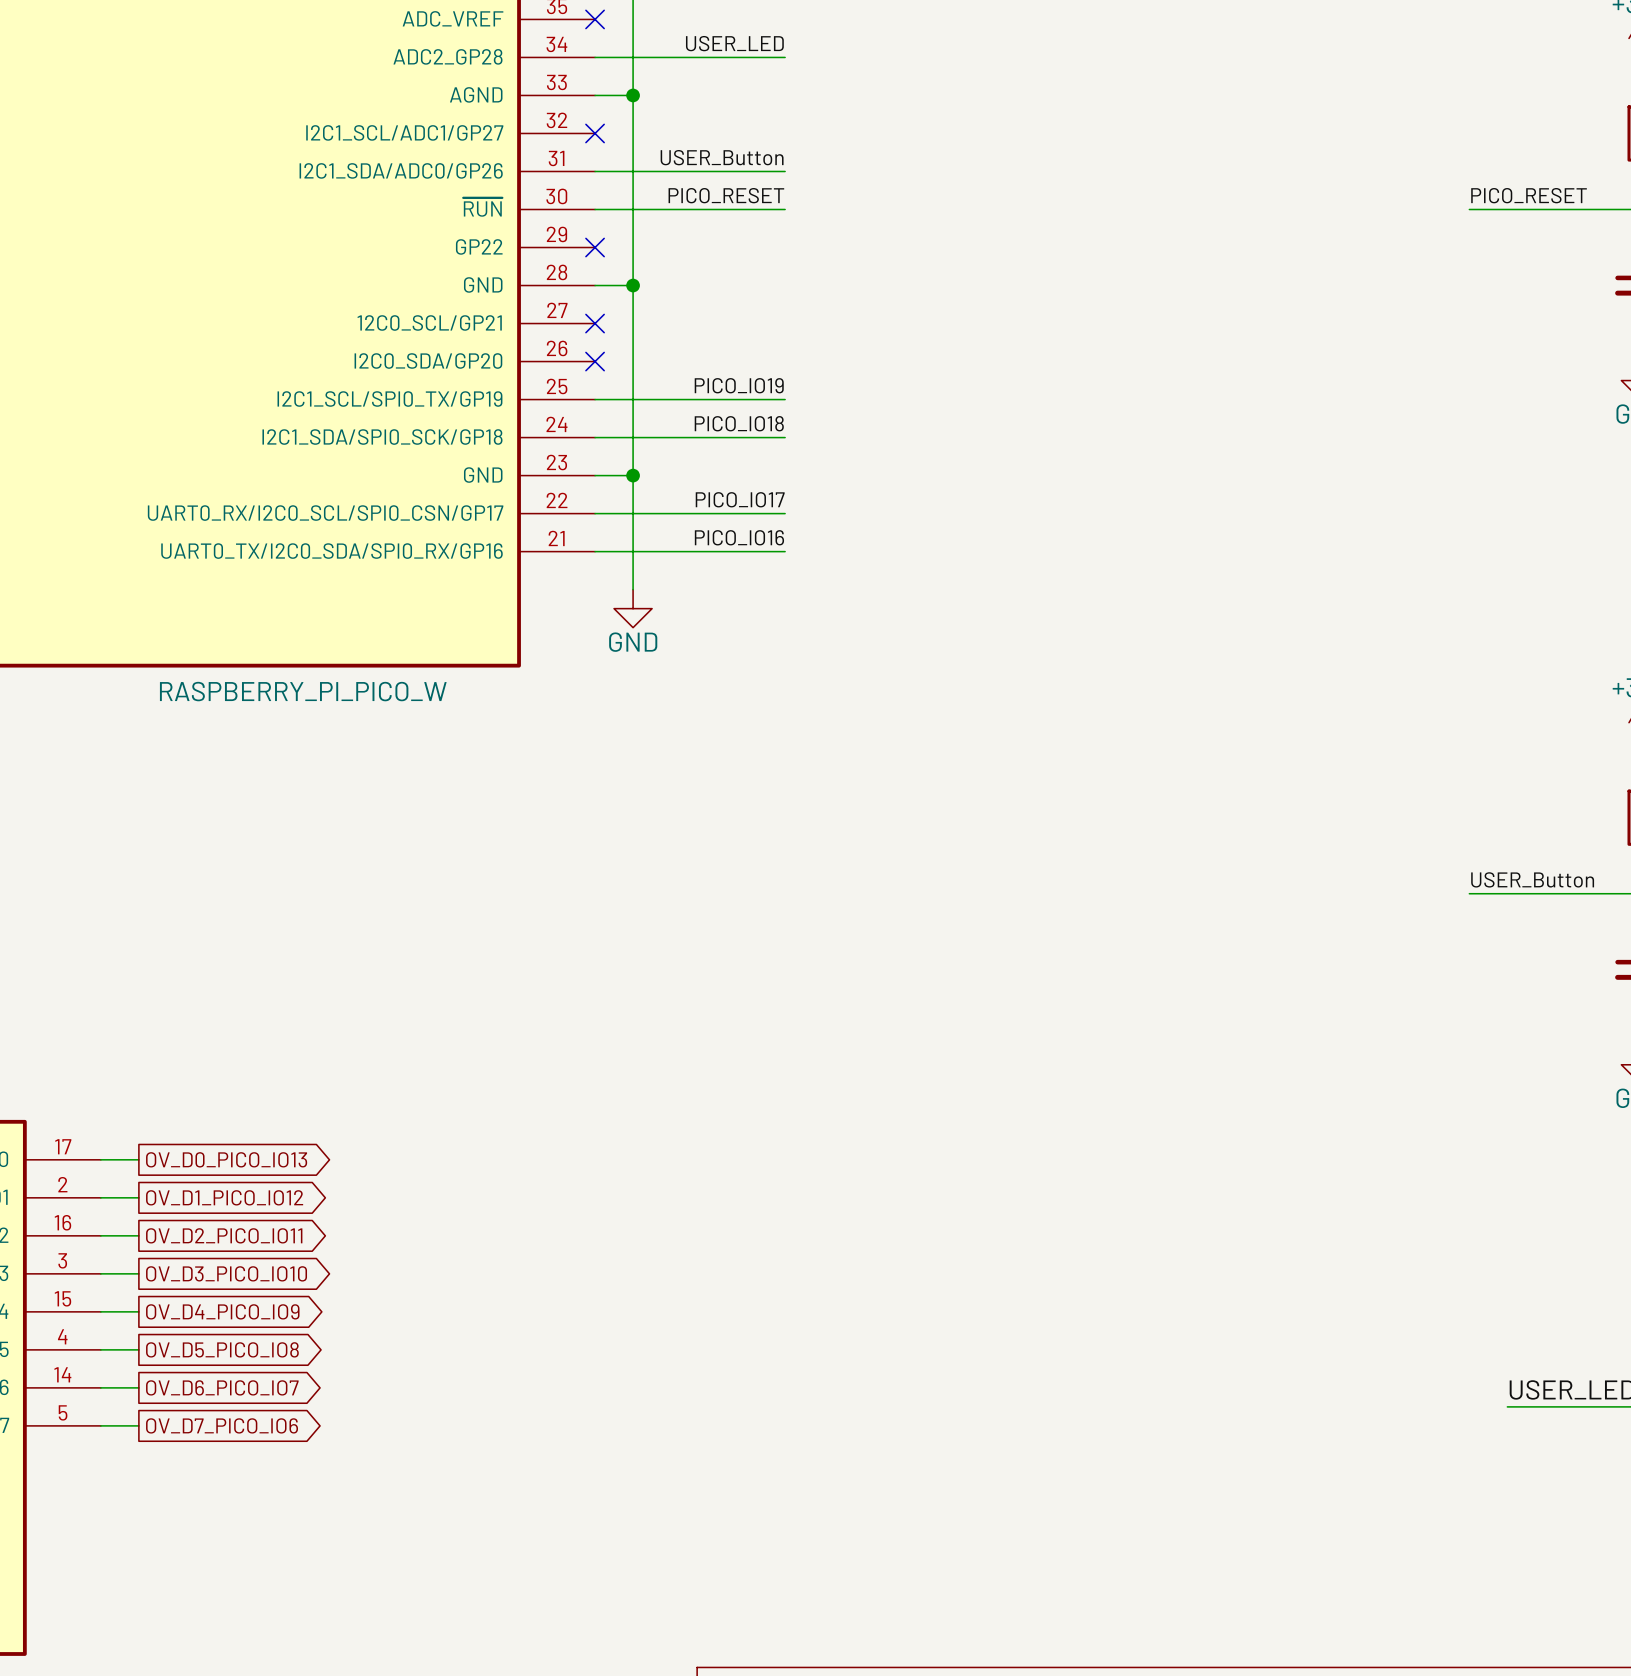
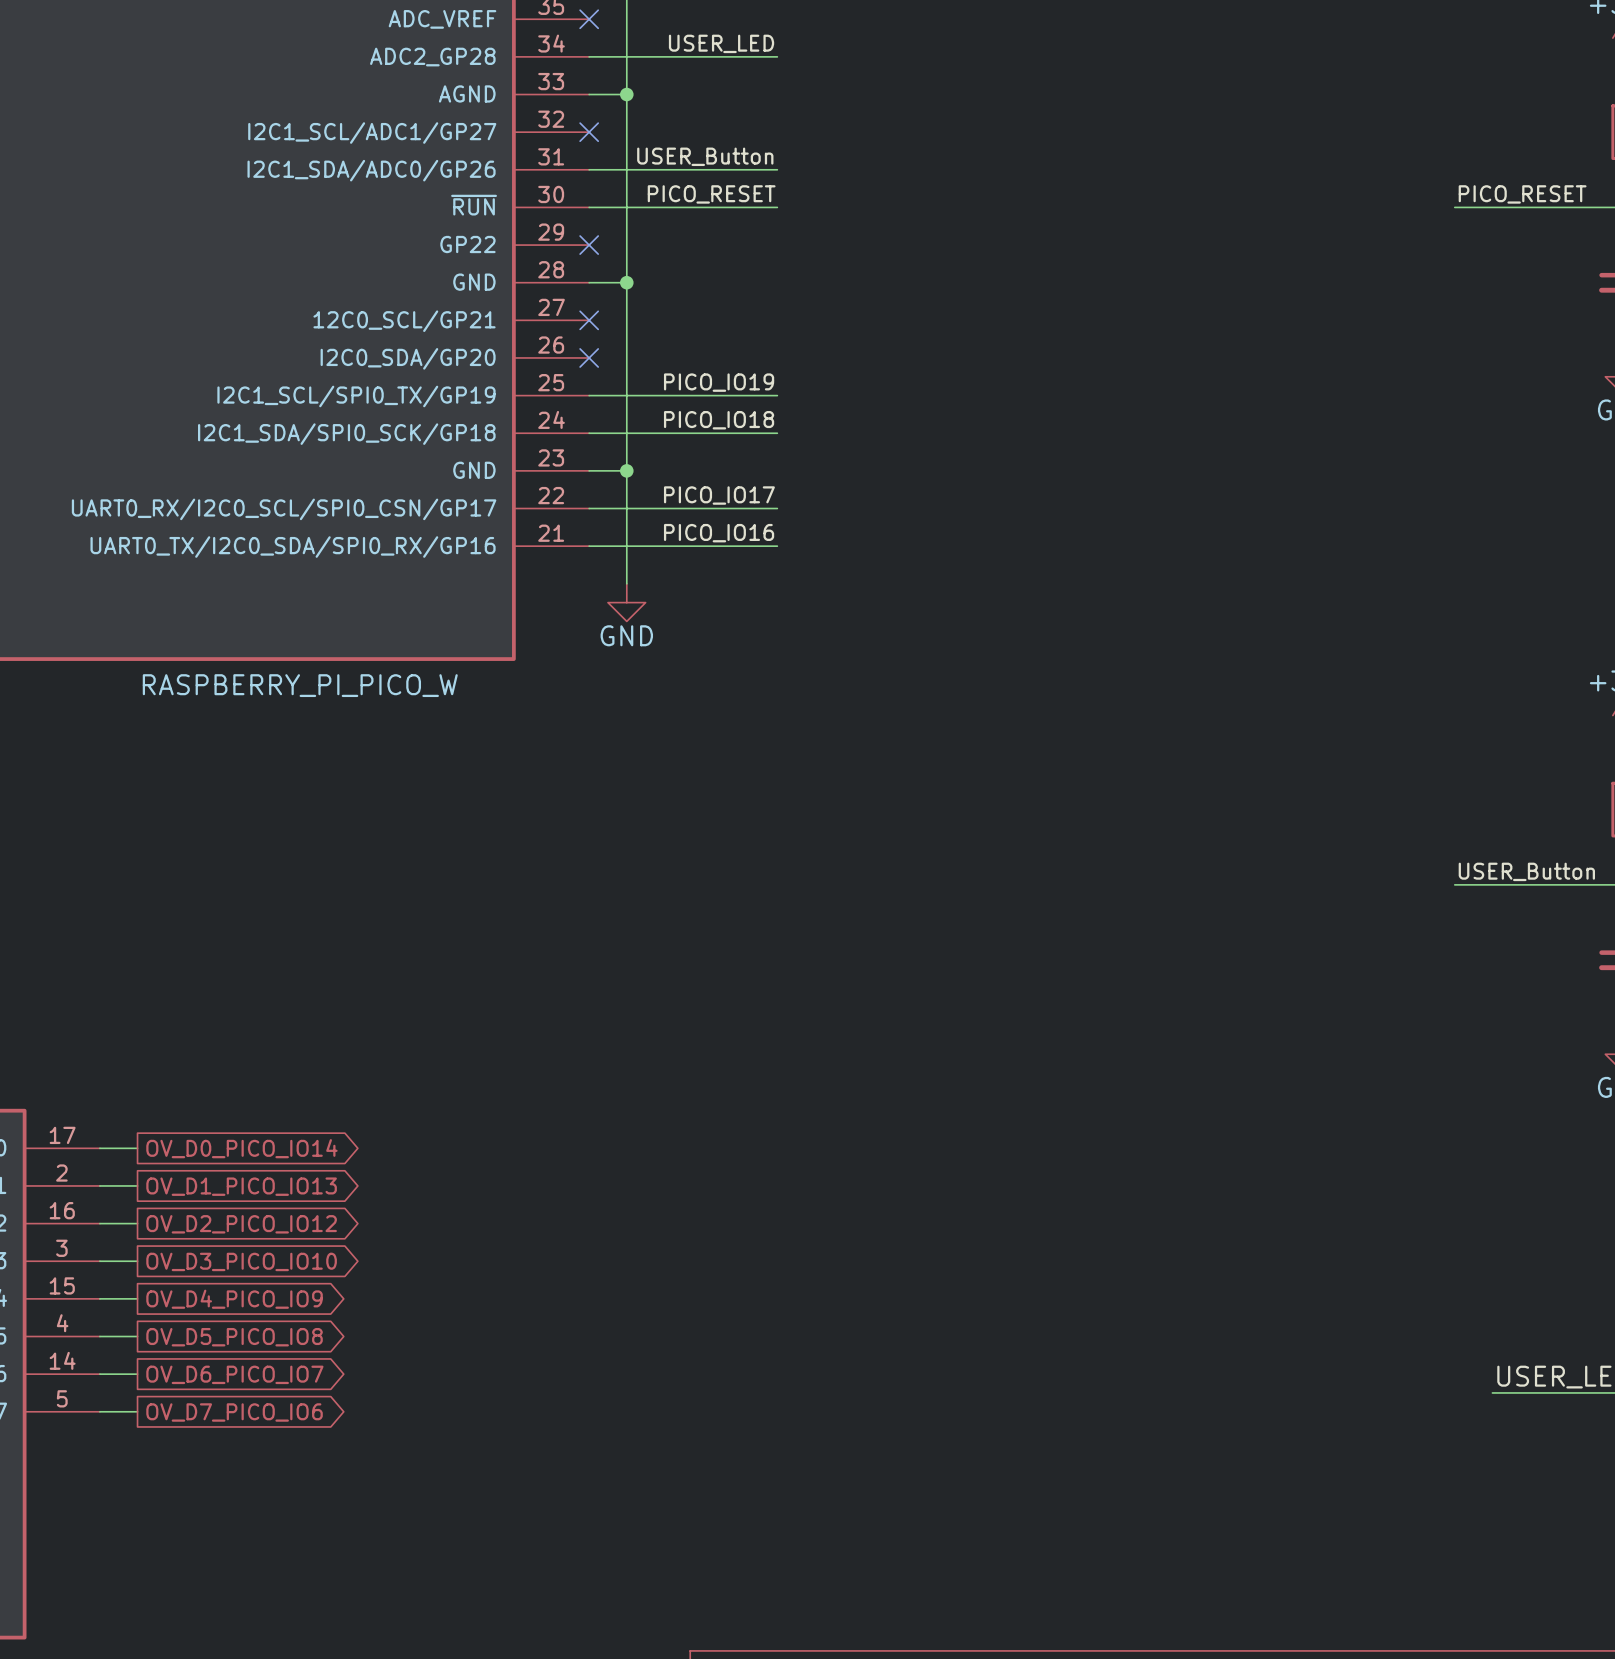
global label: OV_D0_PICO_IO13 (226, 1159) -> OV_D0_PICO_IO14 (241, 1148)
global label: OV_D1_PICO_IO12 (224, 1197) -> OV_D1_PICO_IO13 (241, 1186)
global label: OV_D2_PICO_IO11 (224, 1235) -> OV_D2_PICO_IO12 (241, 1224)

